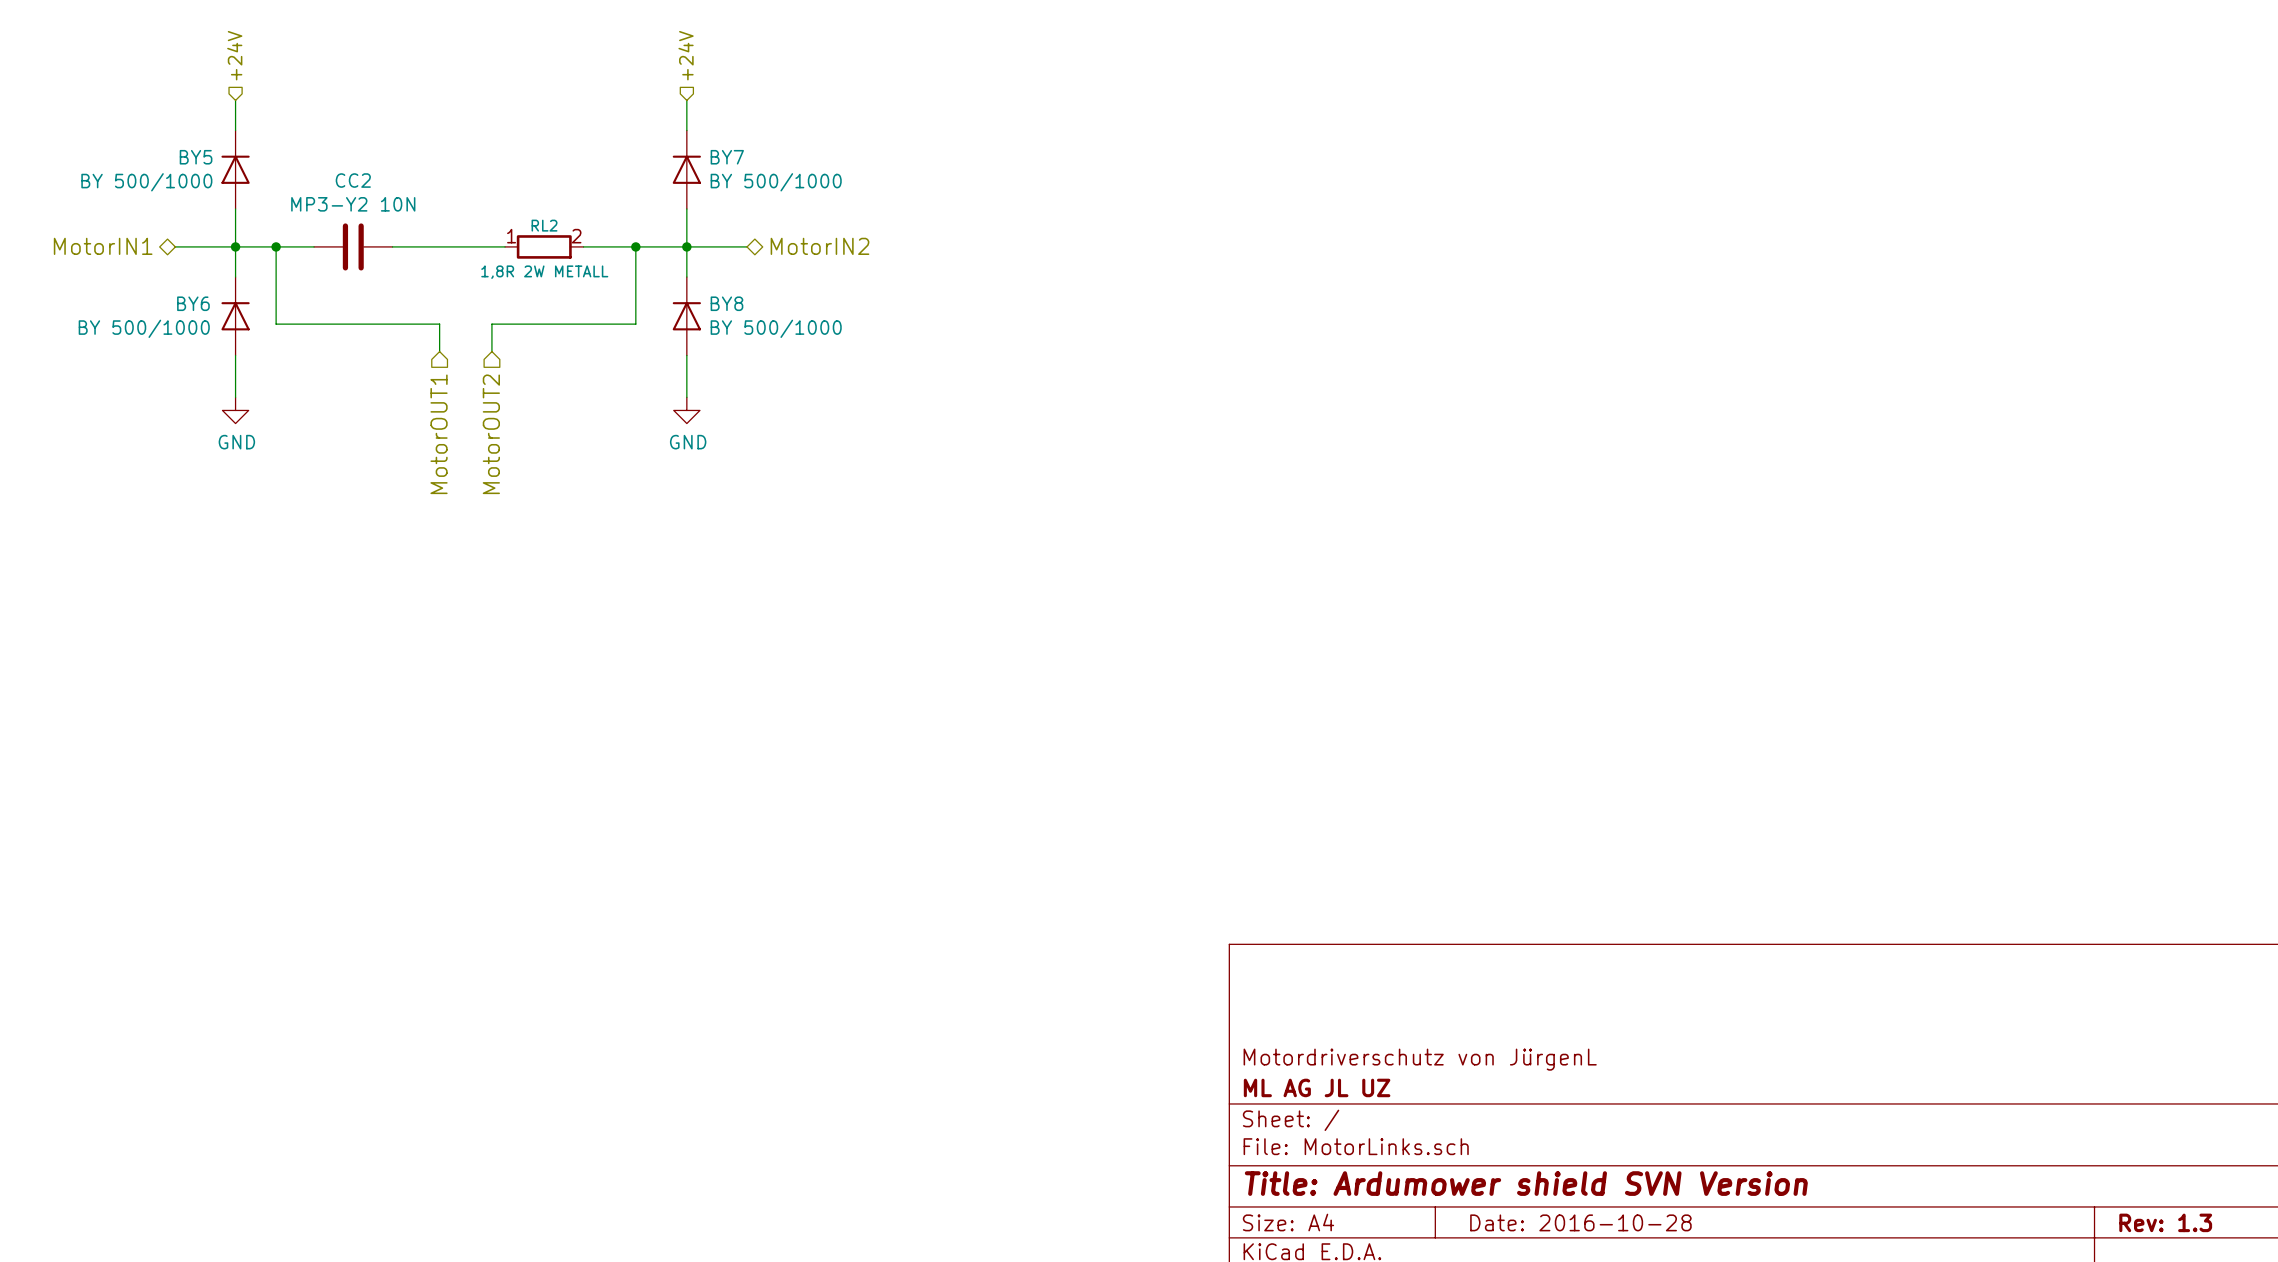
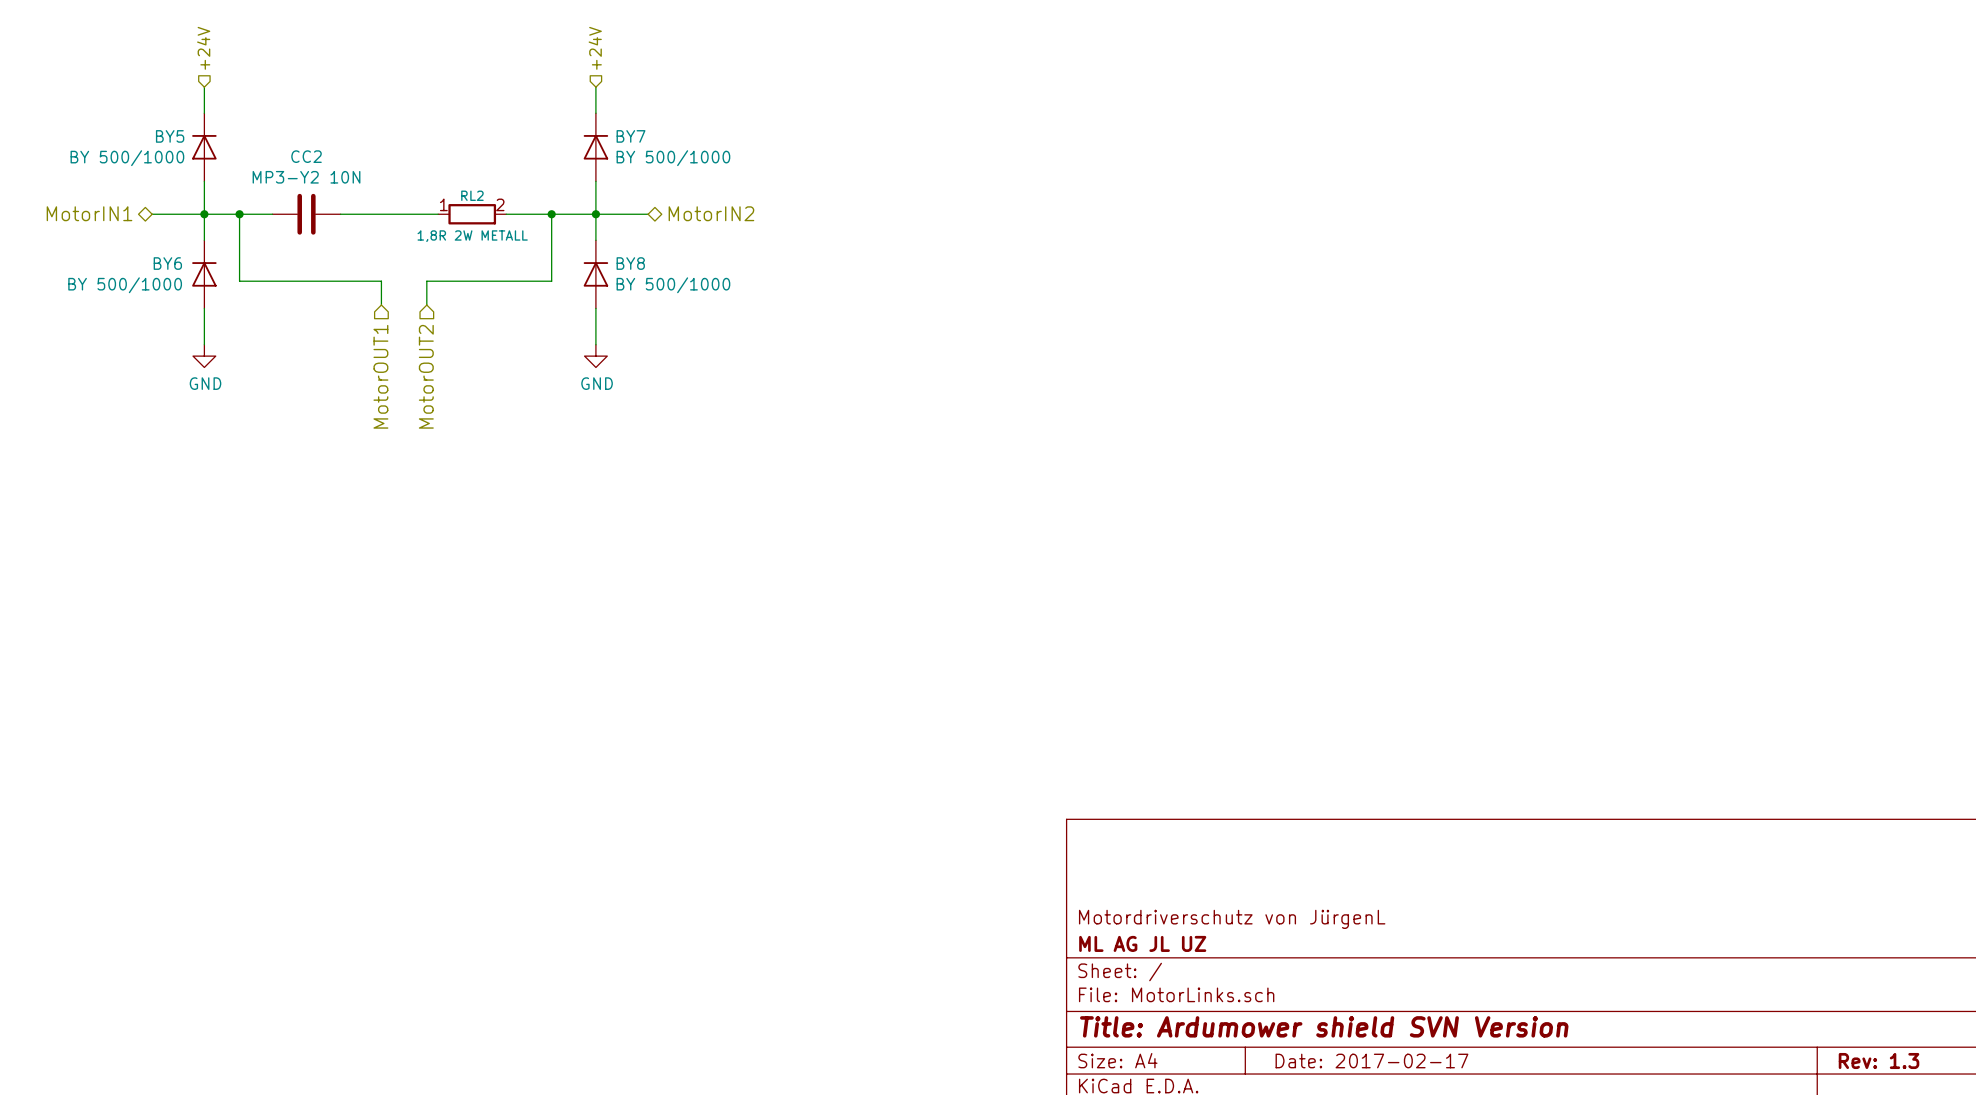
title block: Date: 2016-10-28 (1580, 1222) -> Date: 2017-02-17 (1371, 1061)

